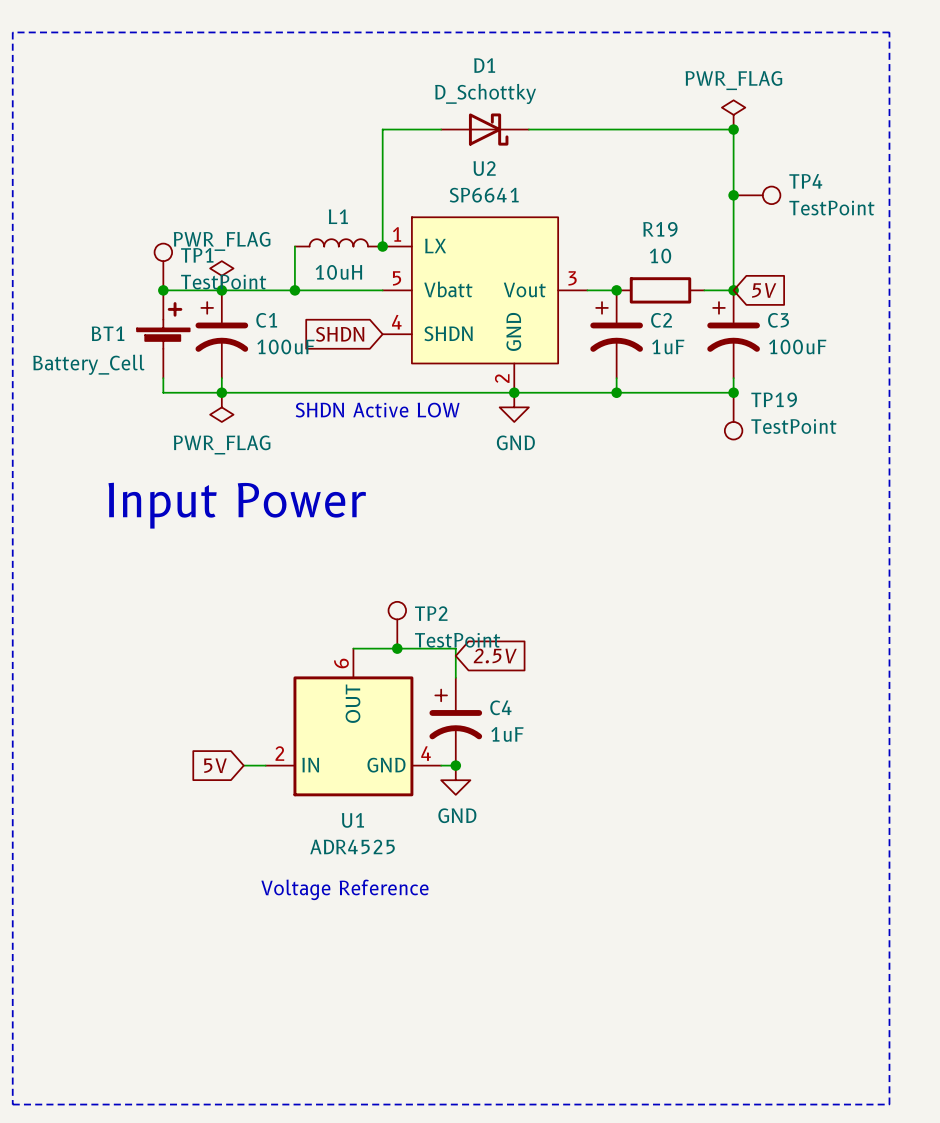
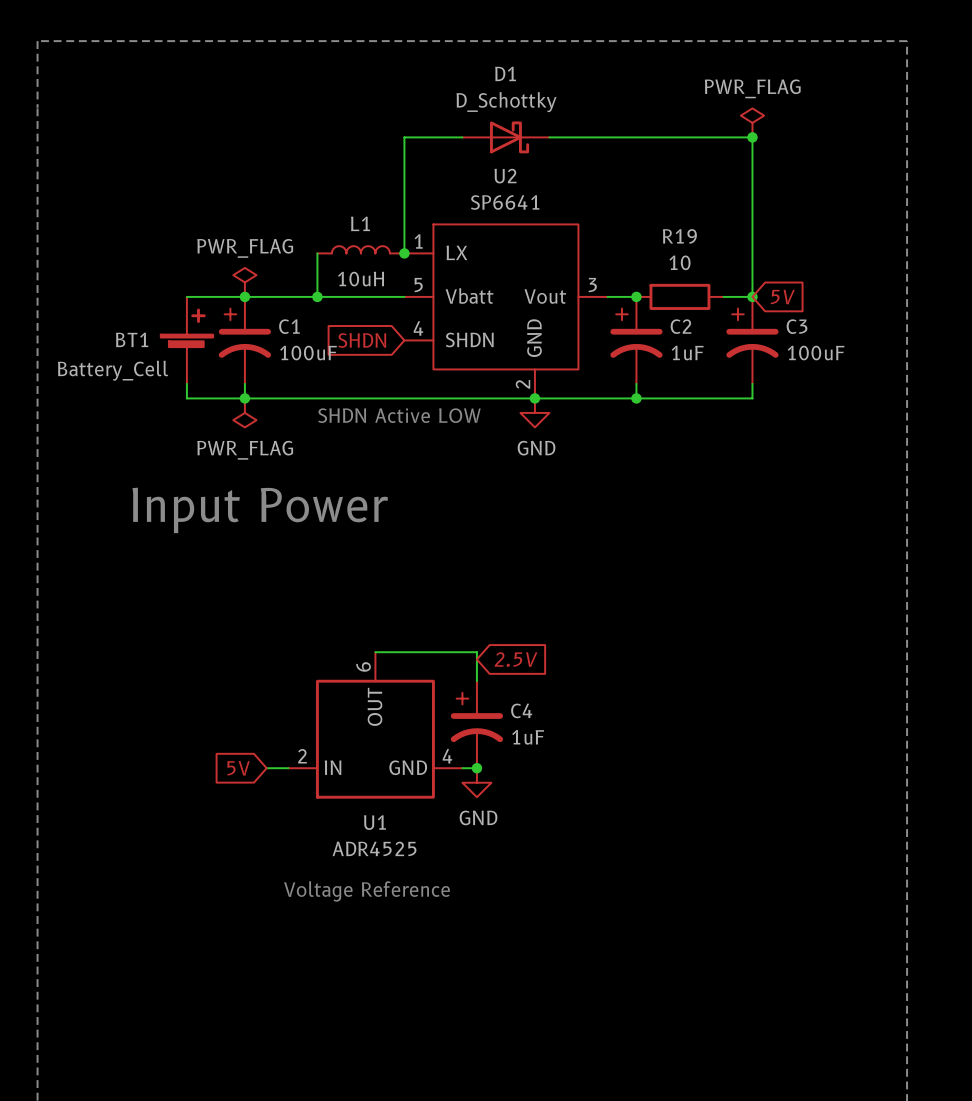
junction: (733, 195) -> none
TP4: TestPoint (757, 195) -> none
TP1: TestPoint (163, 266) -> none
junction: (163, 290) -> none
junction: (733, 392) -> none
TP19: TestPoint (733, 416) -> none
TP2: TestPoint (397, 625) -> none
junction: (397, 648) -> none

